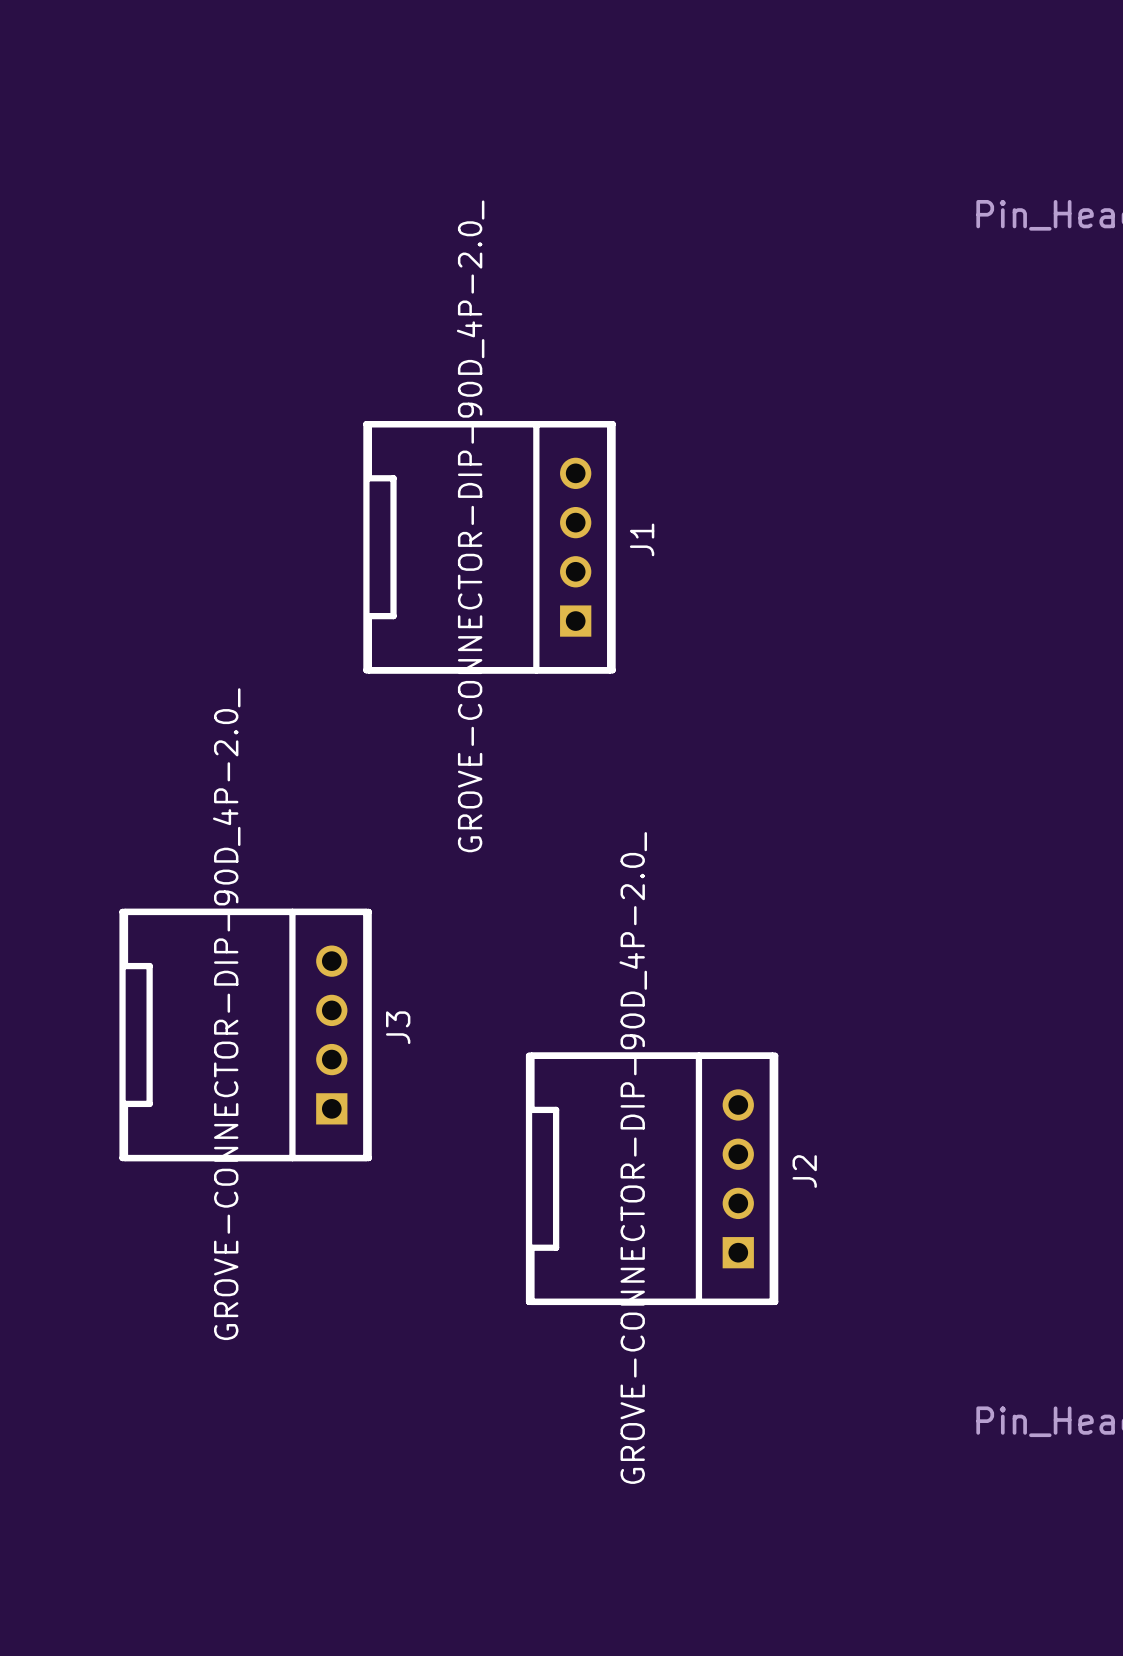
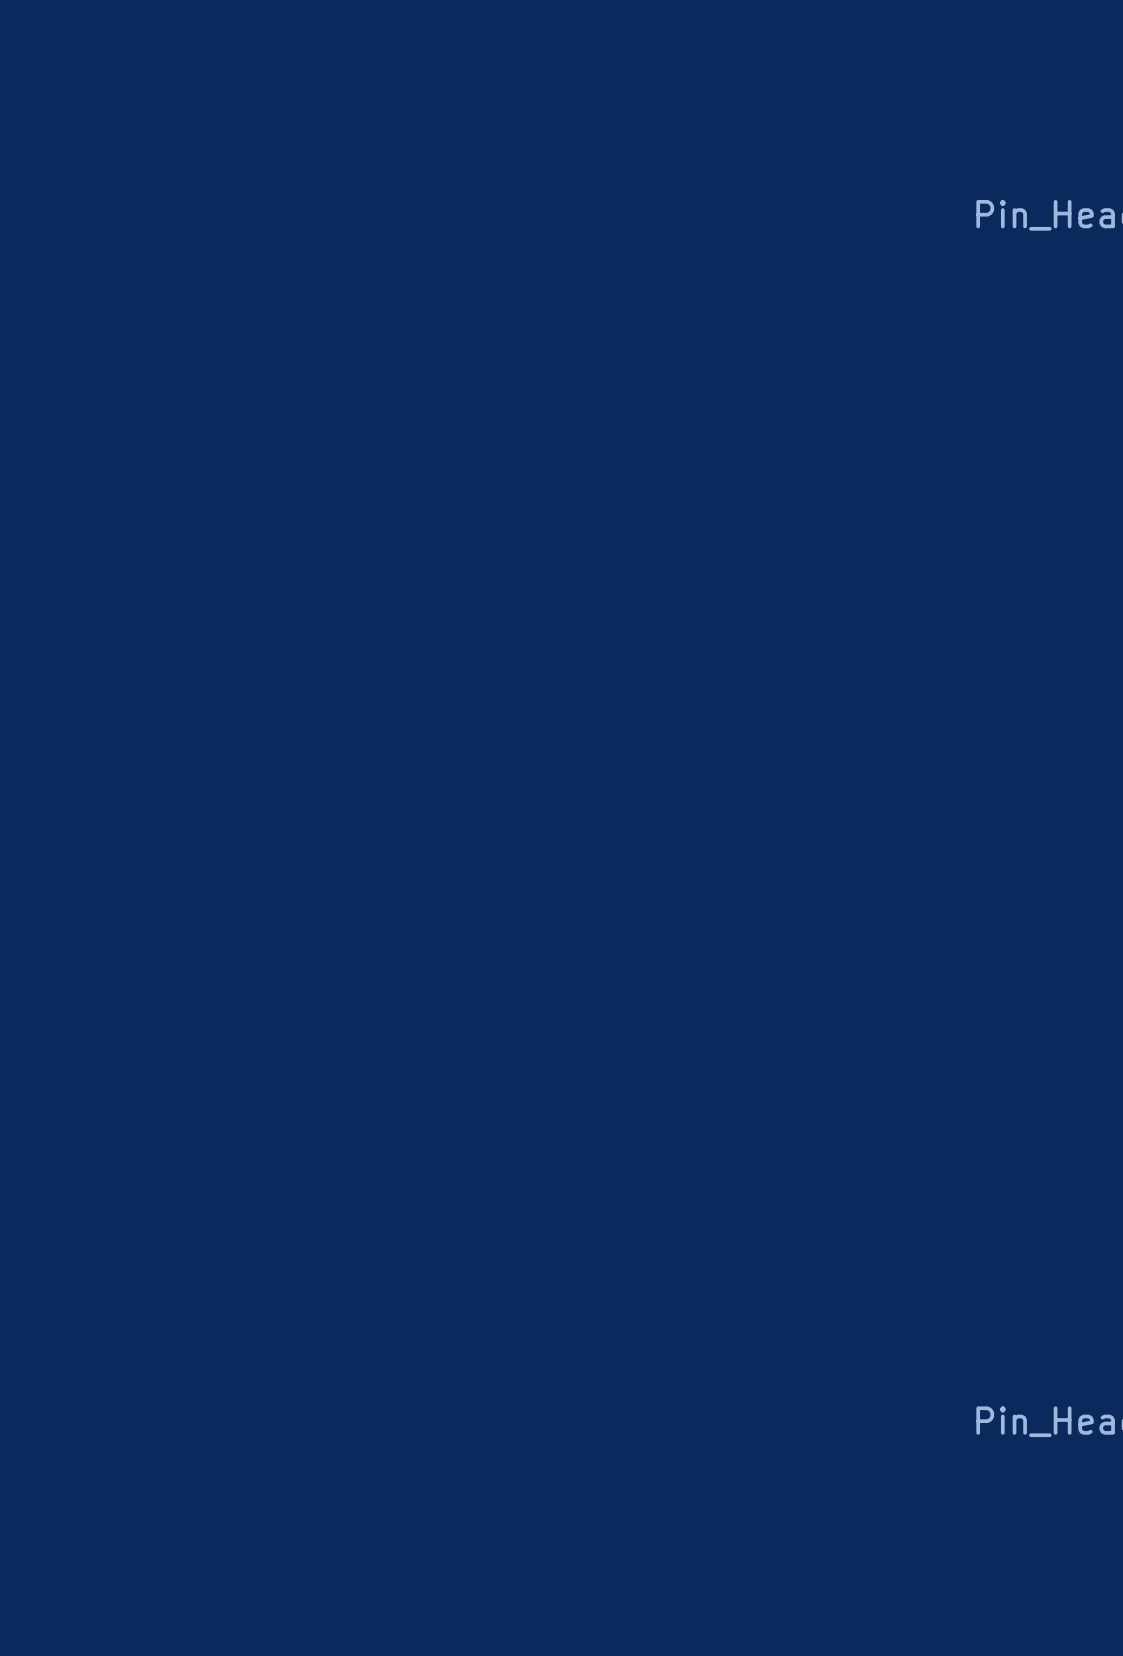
J1: GROVE-CONNECTOR-DIP-90D_4P-2.0_ (489, 547) -> none
J3: GROVE-CONNECTOR-DIP-90D_4P-2.0_ (245, 1034) -> none
J2: GROVE-CONNECTOR-DIP-90D_4P-2.0_ (652, 1178) -> none

